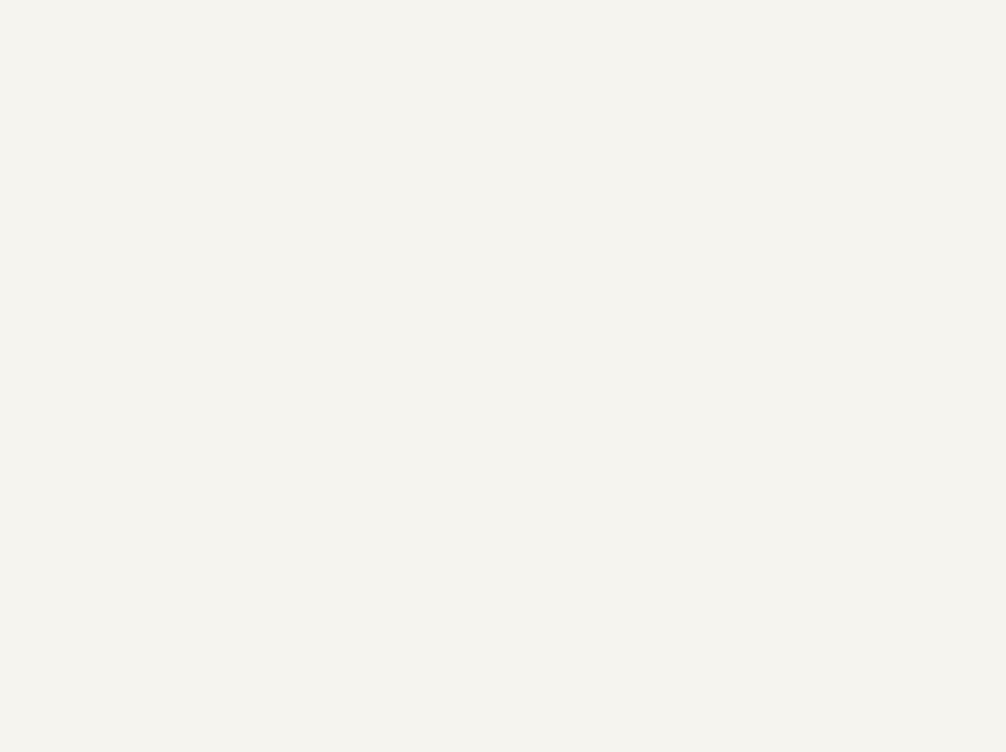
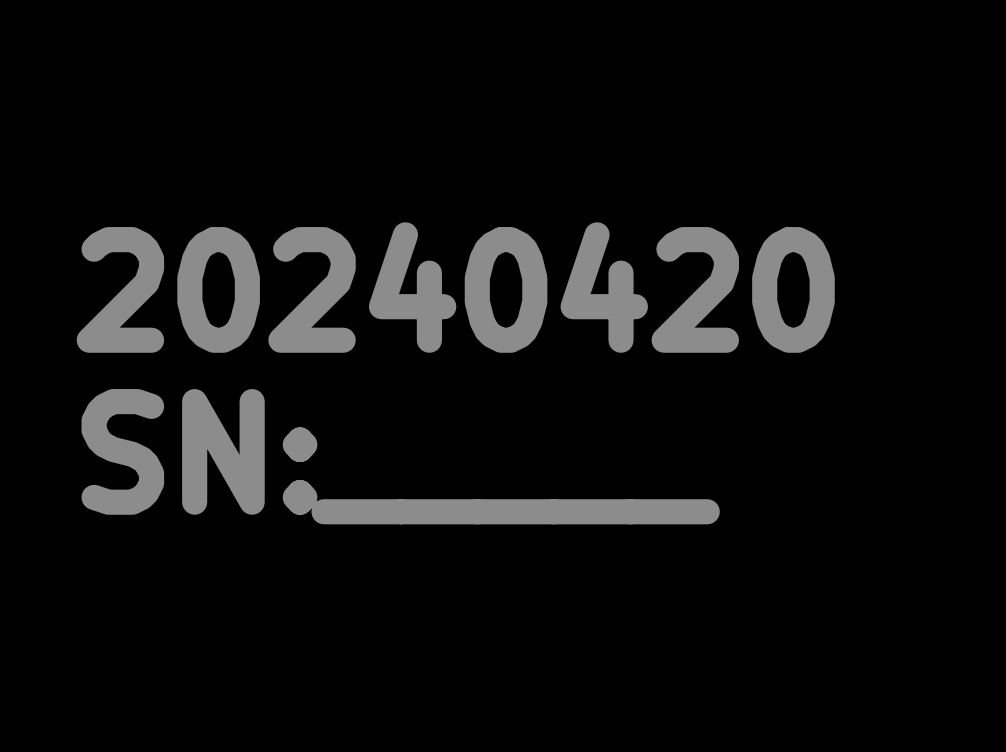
text: none -> 20240420 (455, 287)
text: none -> SN:_____ (400, 456)

